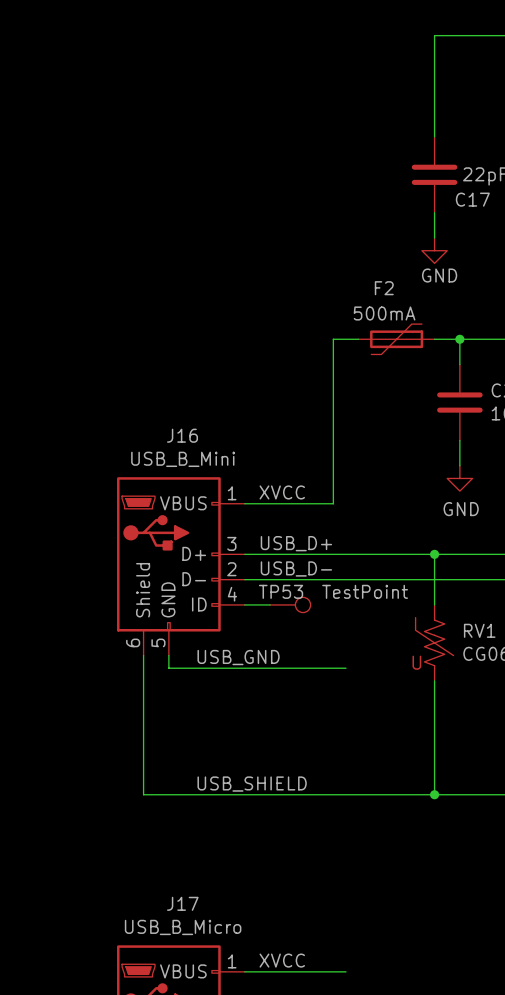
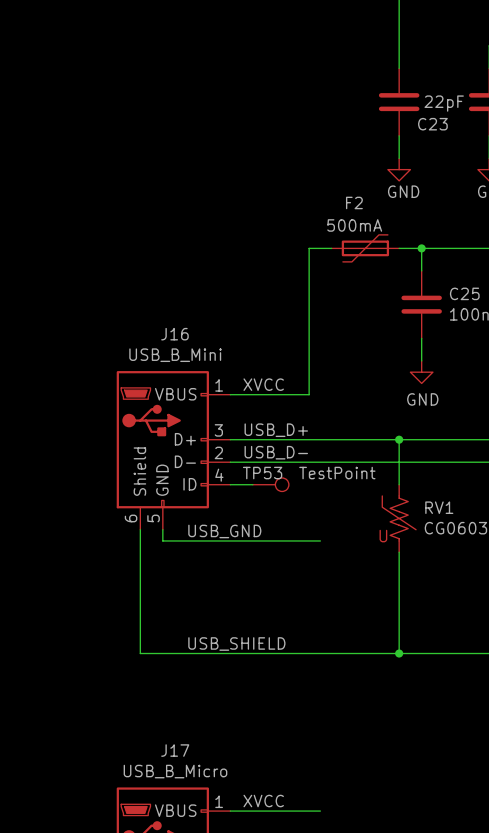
C17 name: C17 (472, 199) -> C23 (432, 124)

